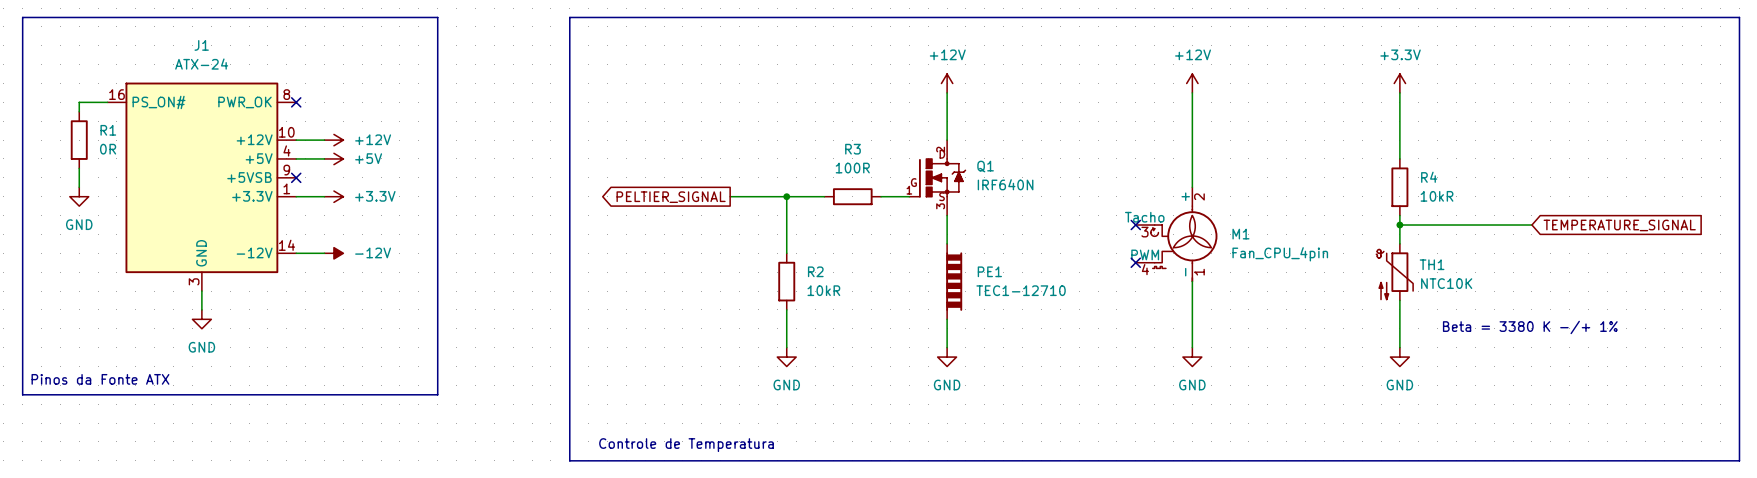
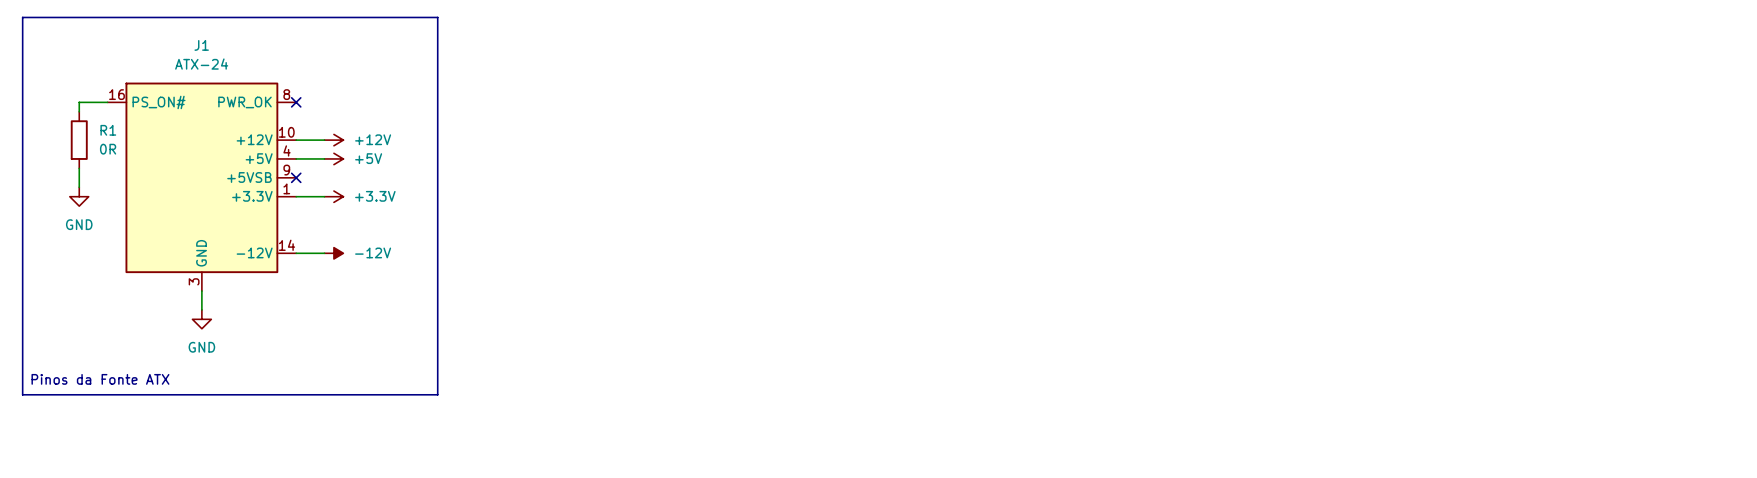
line: (569, 17) (1739, 17) (1739, 460) (569, 460) (569, 17) -> none
power symbol: +12V (947, 83) -> none
power symbol: +12V (1192, 83) -> none
power symbol: +3.3V (1399, 83) -> none
wire: (947, 92) (947, 140) -> none
wire: (1192, 92) (1192, 187) -> none
wire: (1399, 92) (1399, 158) -> none
Q1: IRF640N (937, 177) -> none
R4: 10kR (1399, 187) -> none
wire: (730, 196) (824, 196) -> none
wire: (786, 196) (786, 253) -> none
junction: (786, 196) -> none
R3: 100R (852, 196) -> none
wire: (881, 196) (909, 196) -> none
global label: PELTIER_SIGNAL (671, 197) -> none
wire: (947, 215) (947, 243) -> none
wire: (1399, 215) (1399, 243) -> none
no-connect mark: (1135, 225) -> none
wire: (1399, 225) (1531, 225) -> none
junction: (1399, 225) -> none
global label: TEMPERATURE_SIGNAL (1619, 225) -> none
M1: Fan_CPU_4pin (1176, 234) -> none
no-connect mark: (1135, 262) -> none
TH1: NTC10K (1394, 272) -> none
R2: 10kR (786, 281) -> none
PE1: TEC1-12710 (954, 281) -> none
wire: (1192, 281) (1192, 347) -> none
wire: (1399, 300) (1399, 347) -> none
wire: (786, 309) (786, 347) -> none
wire: (947, 319) (947, 347) -> none
text: Beta = 3380 K -/+ 1% (1530, 327) -> none
power symbol: GND (786, 357) -> none
power symbol: GND (947, 357) -> none
power symbol: GND (1192, 357) -> none
power symbol: GND (1399, 357) -> none
text: Controle de Temperatura (686, 445) -> none

